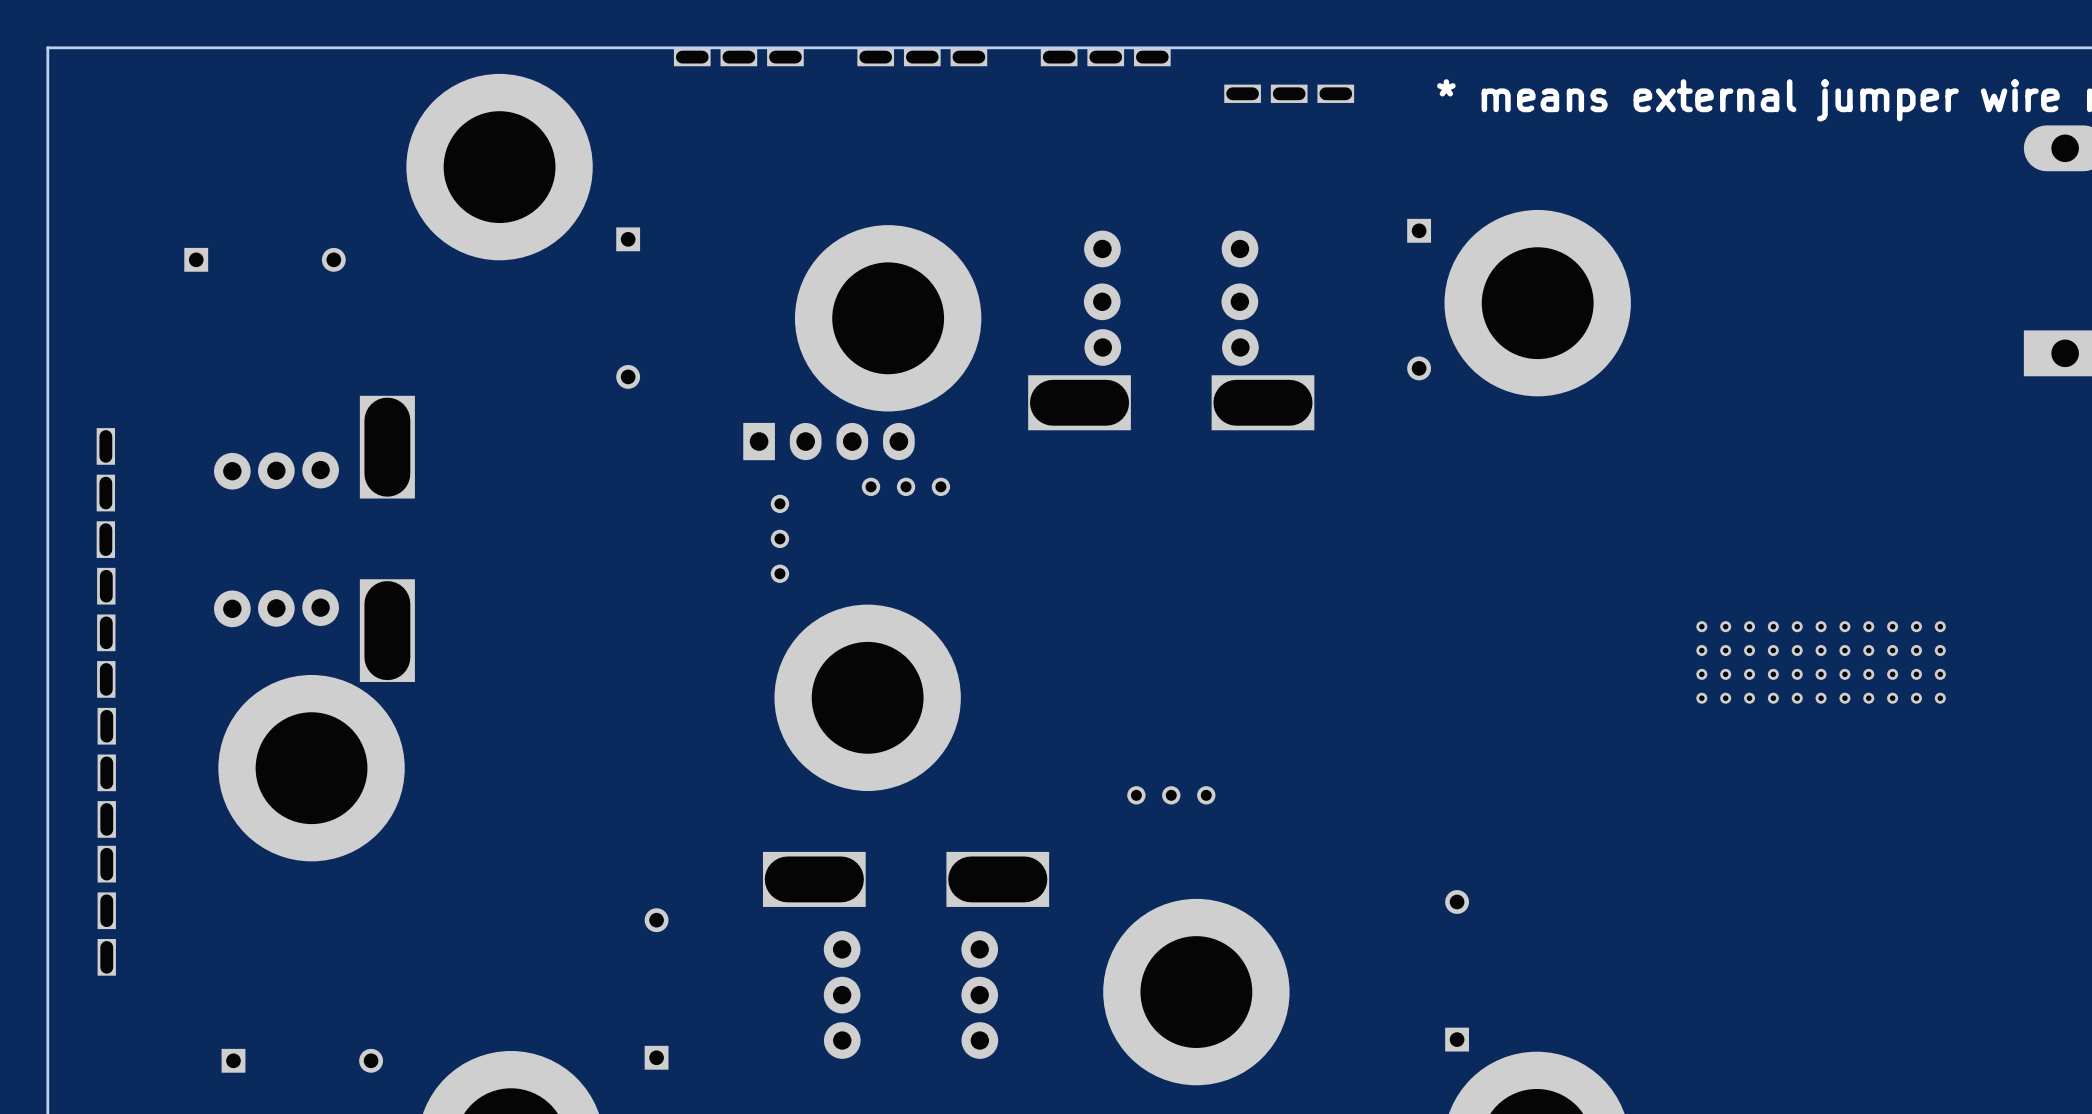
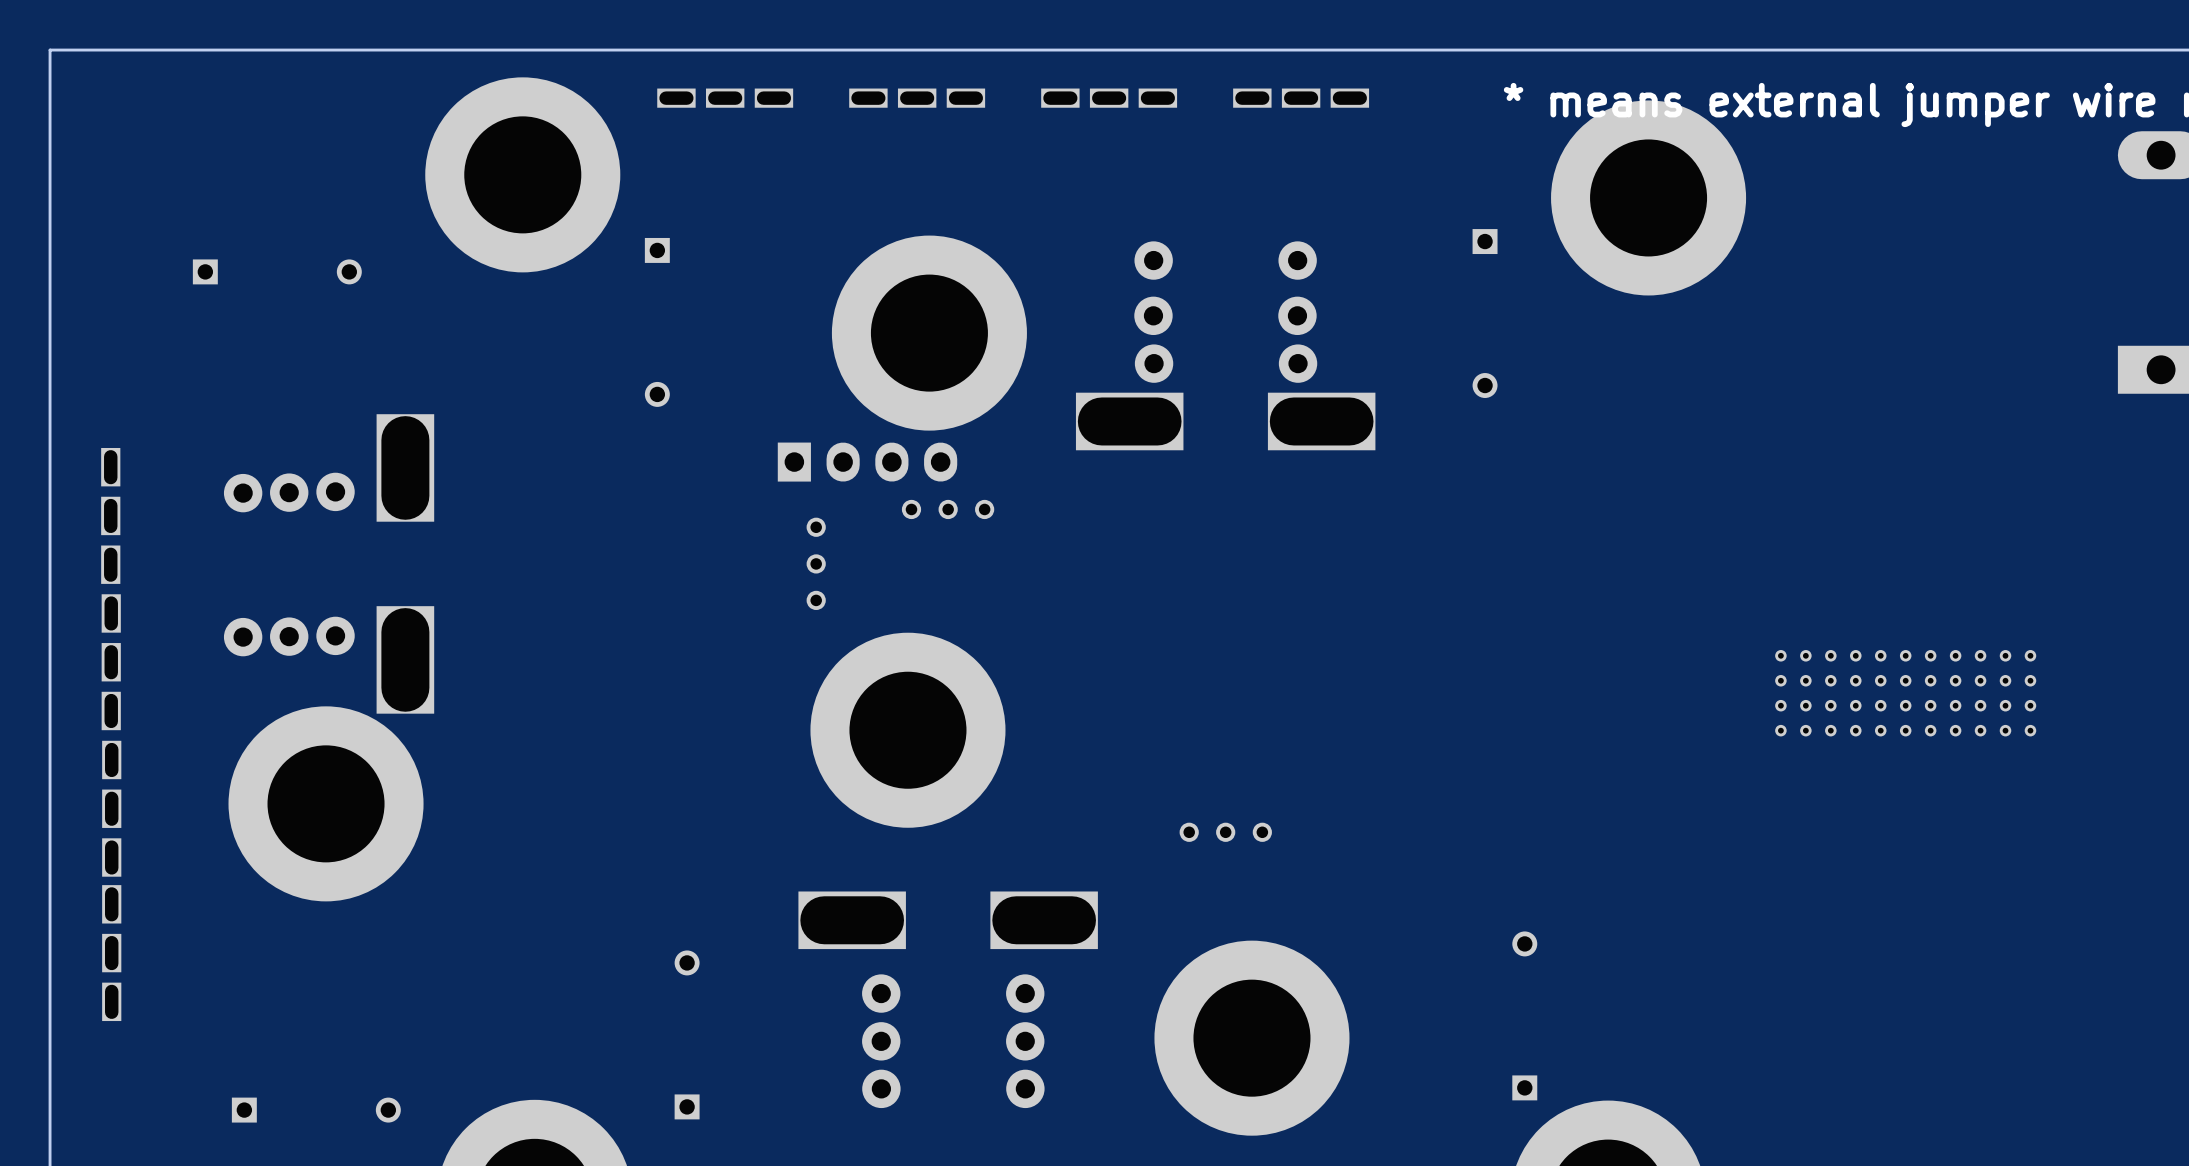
part position: (738, 57) -> (725, 98)
part position: (922, 57) -> (917, 98)
part position: (1105, 57) -> (1109, 98)
part position: (1289, 93) -> (1301, 98)
part position: (1537, 303) -> (1648, 197)

